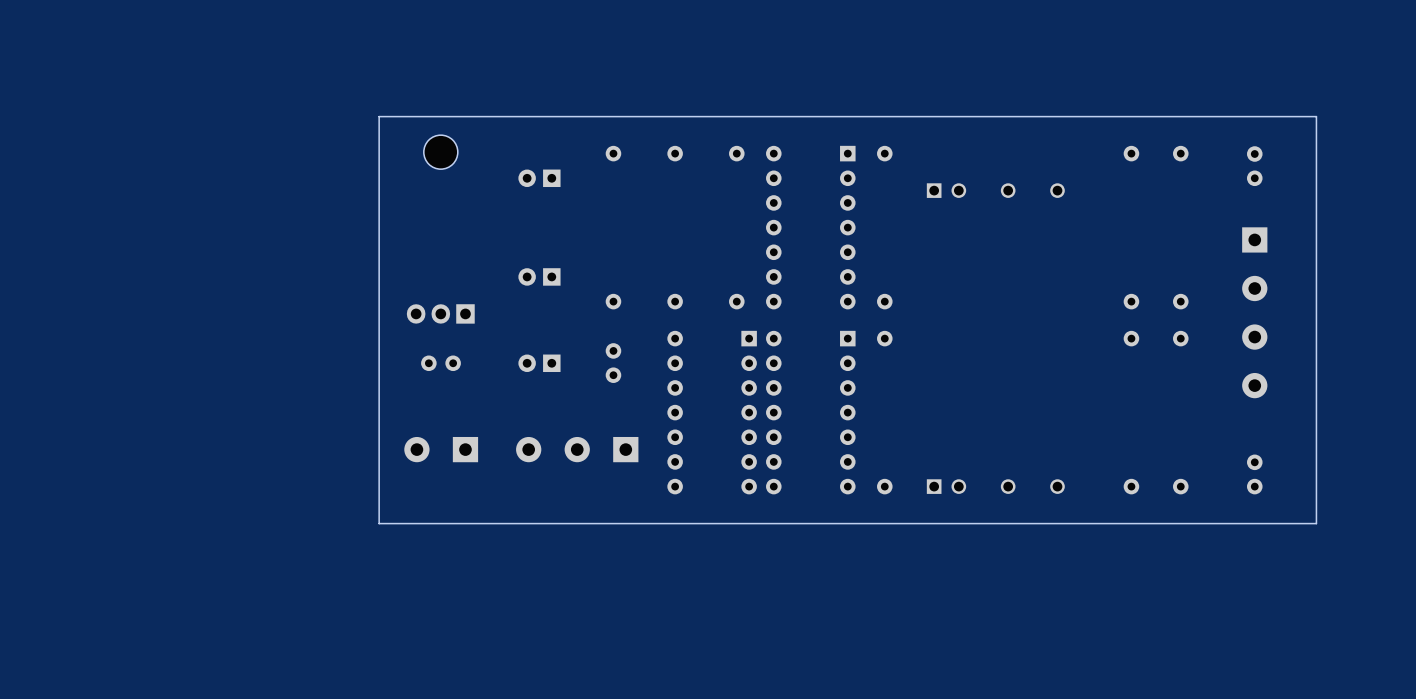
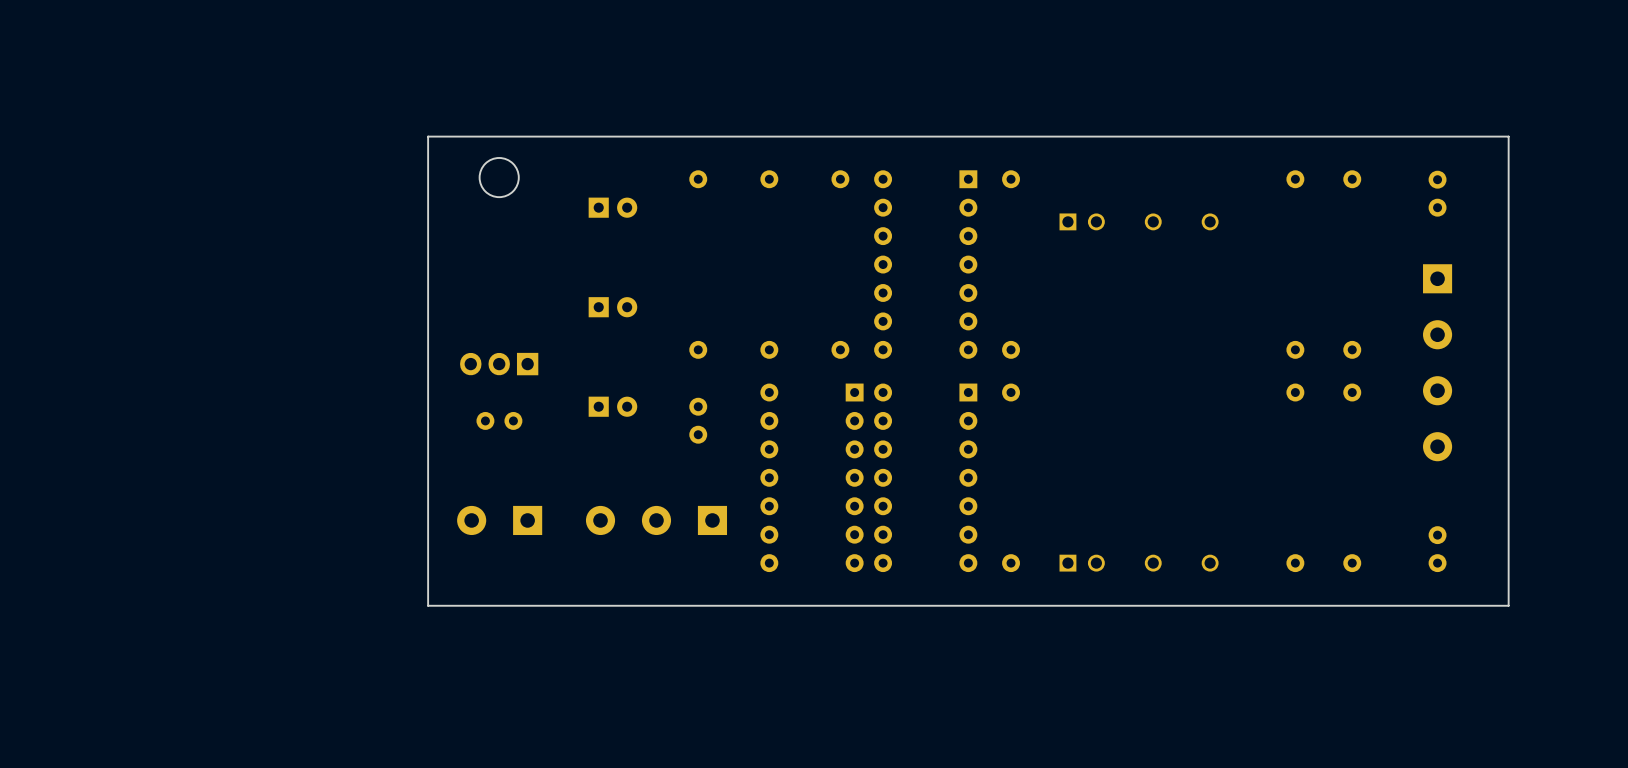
part rotation: 0° (539, 178) -> 180° (612, 207)
part rotation: 0° (539, 276) -> 180° (612, 307)
part rotation: 0° (539, 363) -> 180° (612, 406)

